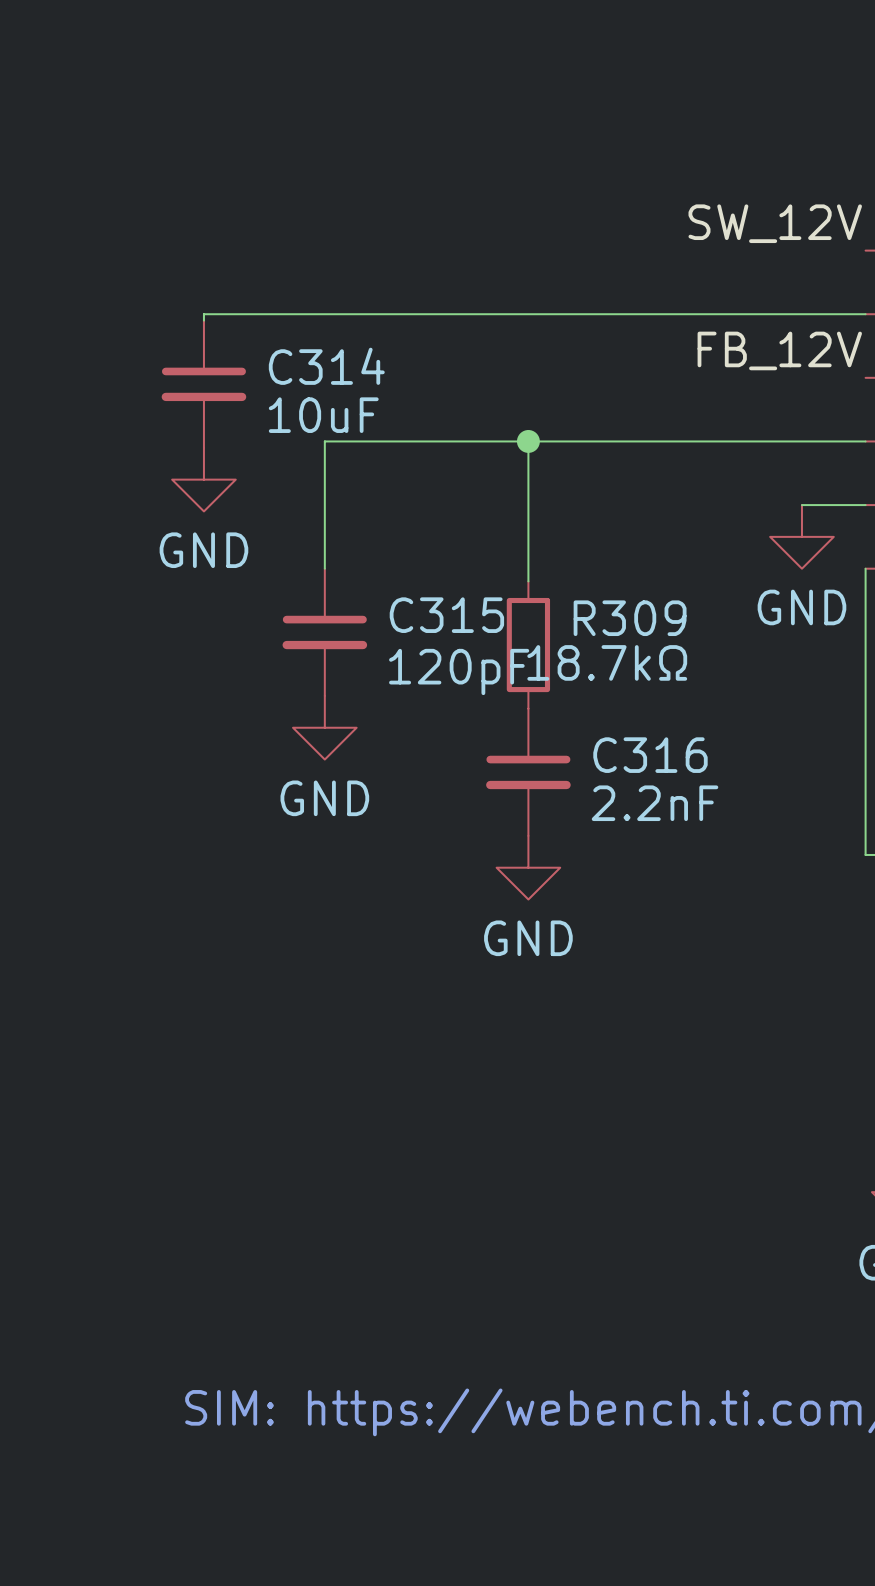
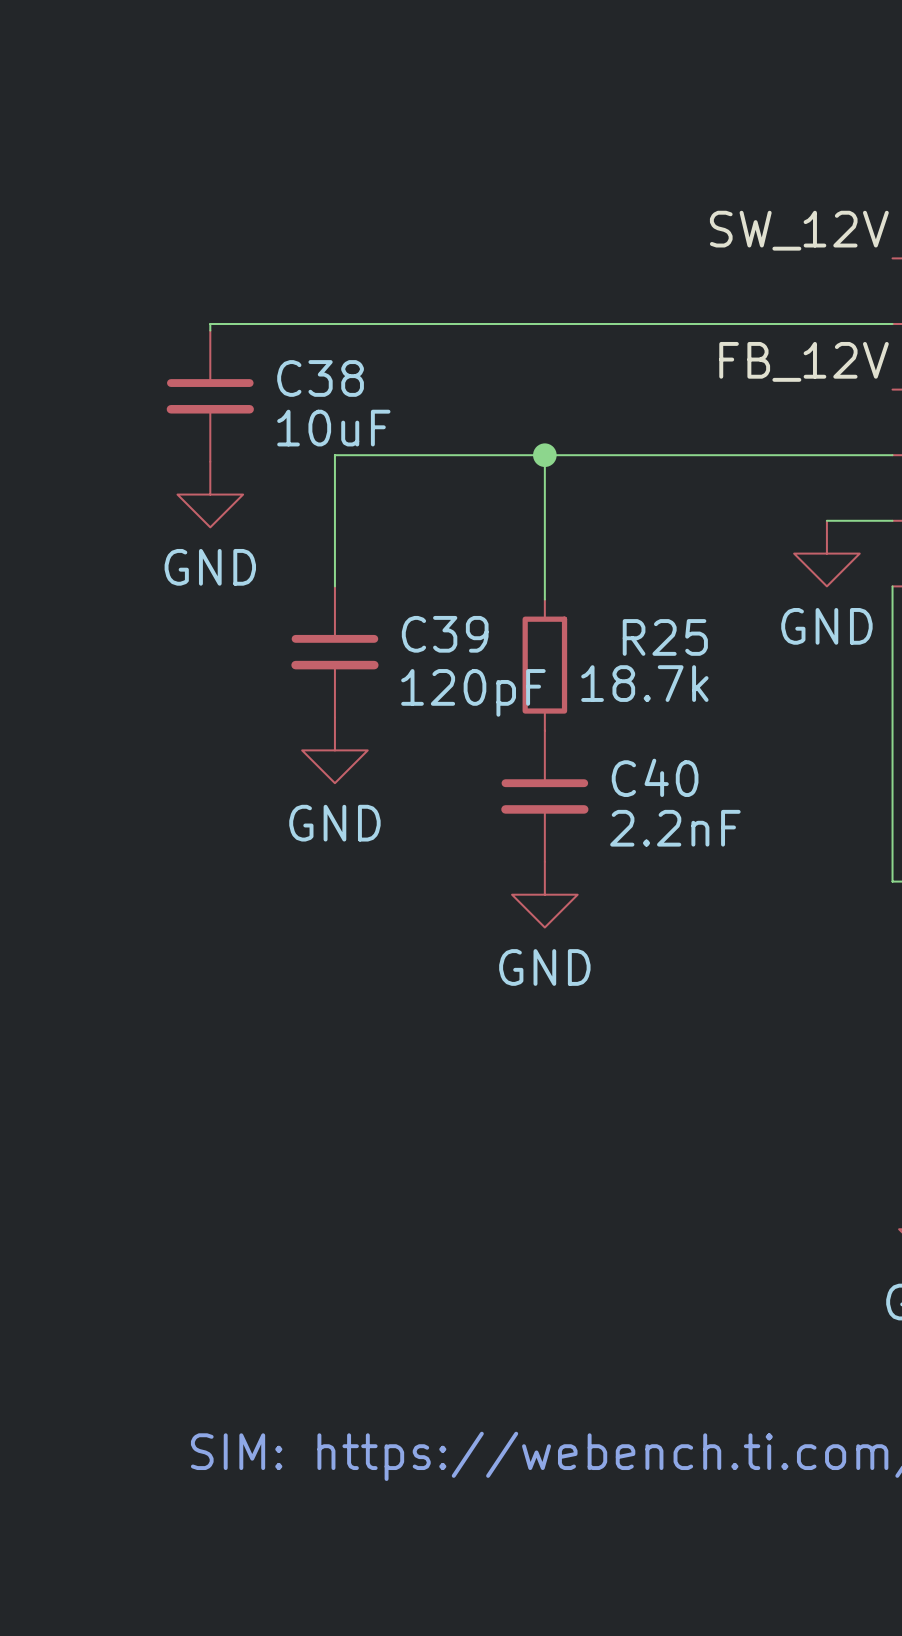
C314 name: C314 (326, 366) -> C38 (320, 378)
C315 name: C315 (446, 615) -> C39 (445, 634)
R309 name: R309 (630, 618) -> R25 (665, 637)
R309 value: 18.7kΩ (607, 662) -> 18.7k (644, 683)
C316 name: C316 (650, 755) -> C40 (655, 777)

